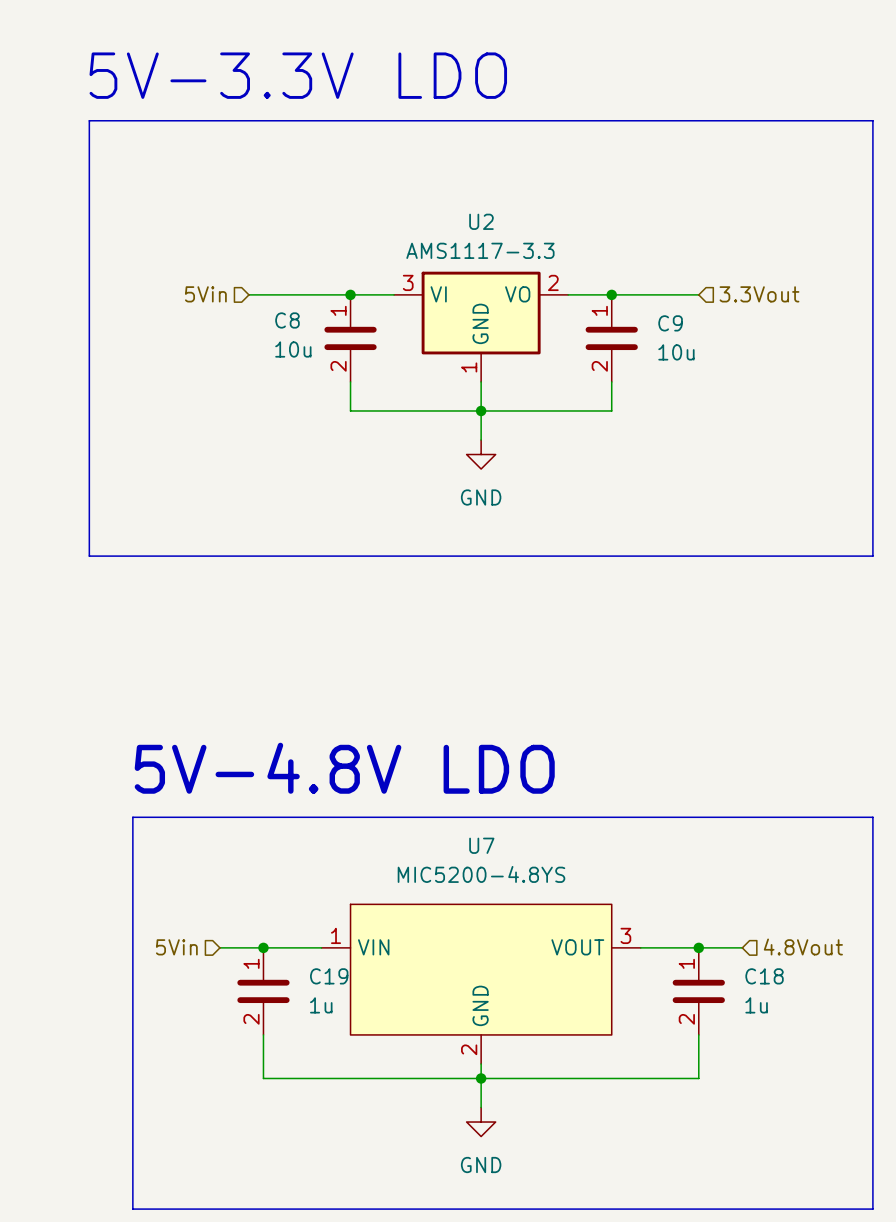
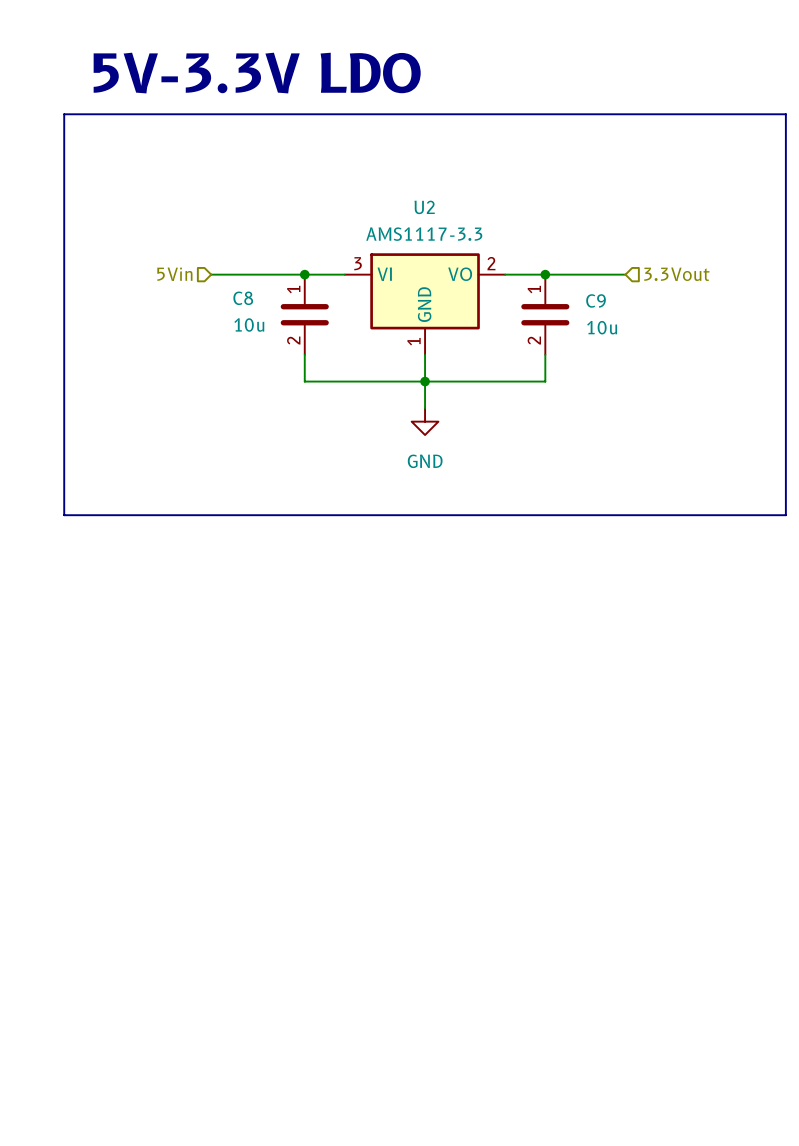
text: 5V-4.8V LDO (344, 768) -> none
line: (132, 817) (872, 817) (872, 1209) (132, 1209) (132, 817) -> none
hierarchical label: 5Vin (176, 947) -> none
wire: (219, 947) (321, 947) -> none
junction: (263, 947) -> none
wire: (640, 947) (742, 947) -> none
junction: (698, 947) -> none
hierarchical label: 4.8Vout (803, 947) -> none
U7: MIC5200-4.8YS (481, 984) -> none
C19: 1u (263, 991) -> none
C18: 1u (698, 991) -> none
wire: (263, 1034) (263, 1078) (698, 1078) (698, 1034) -> none
wire: (481, 1063) (481, 1107) -> none
junction: (481, 1078) -> none
power symbol: GND (481, 1122) -> none

